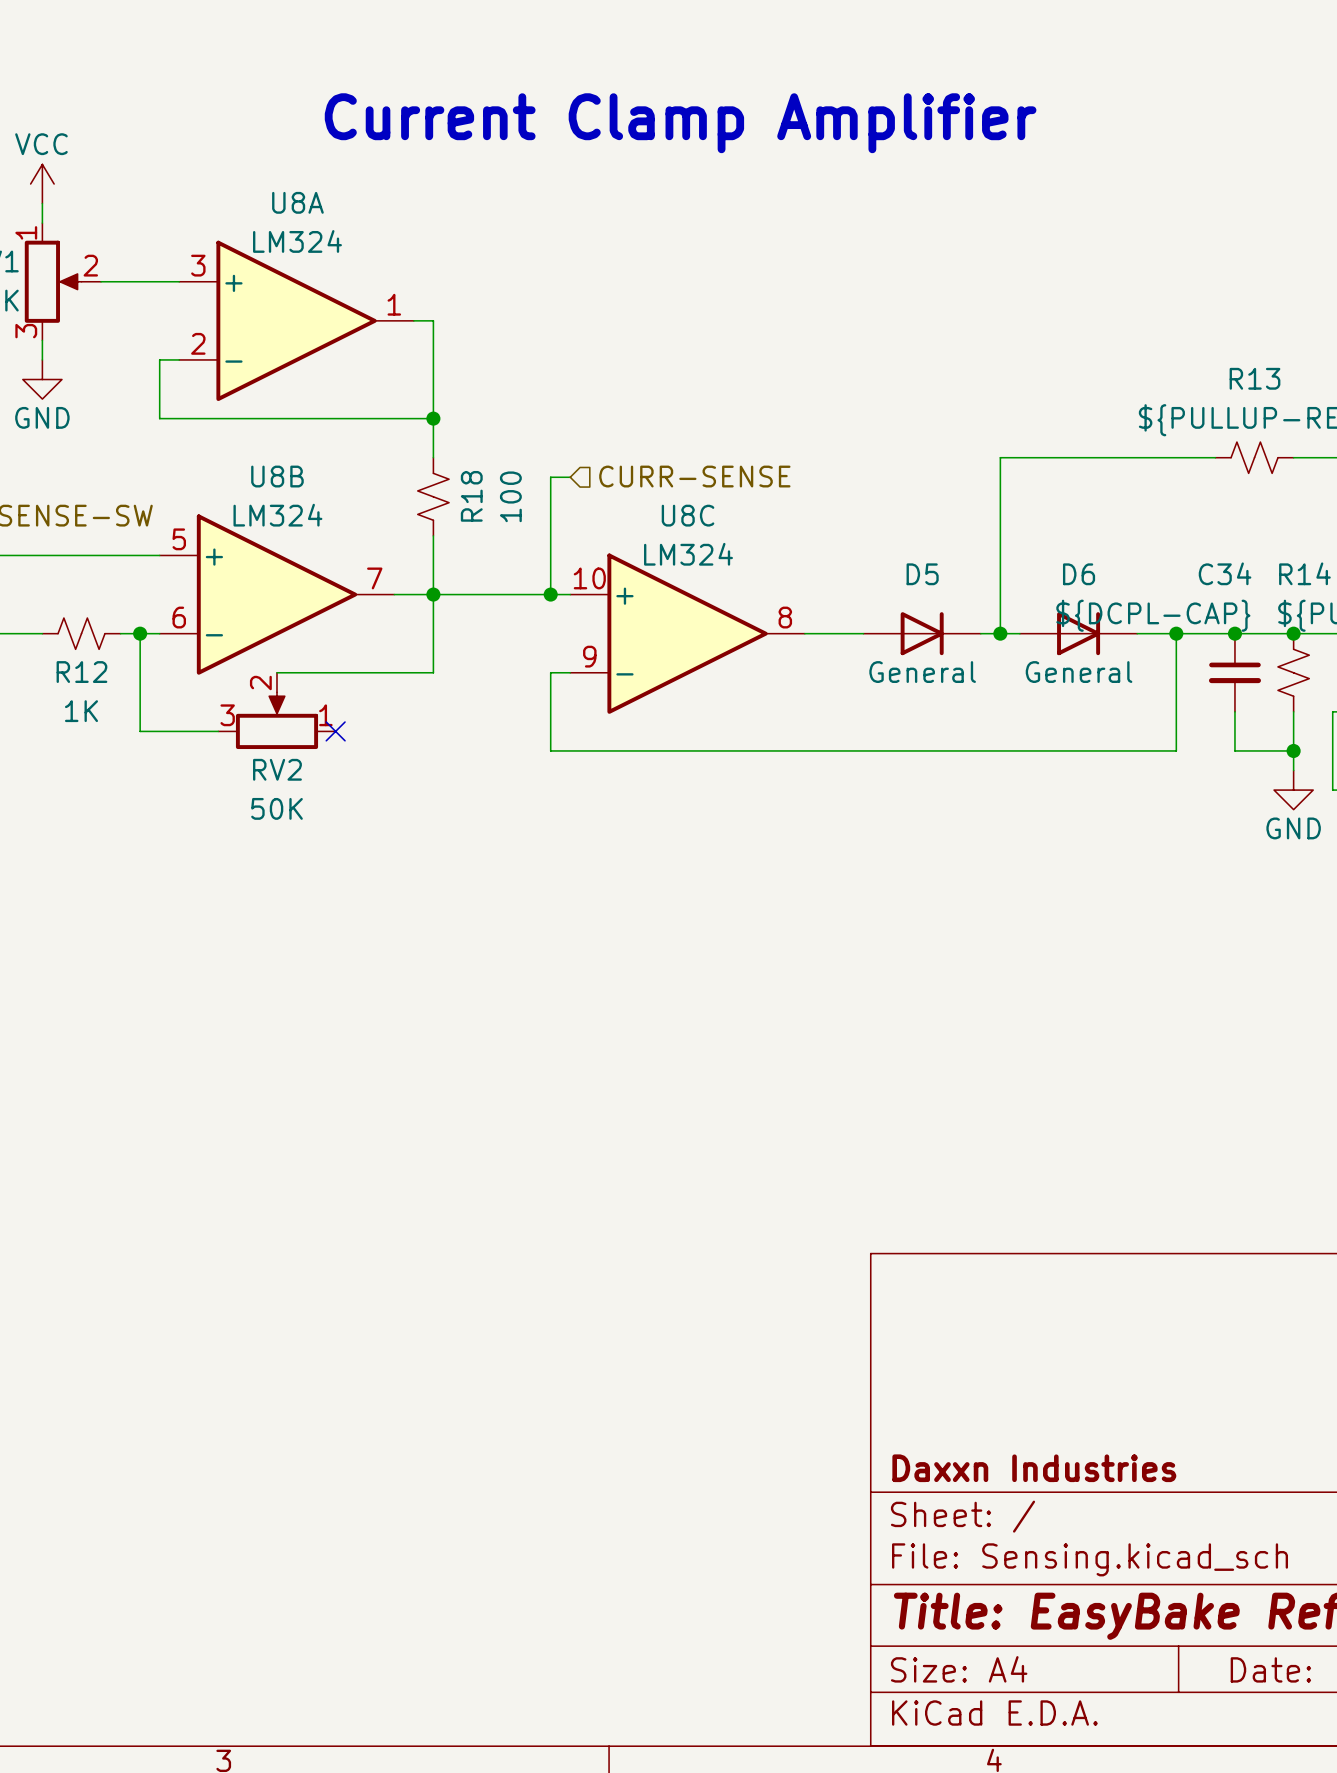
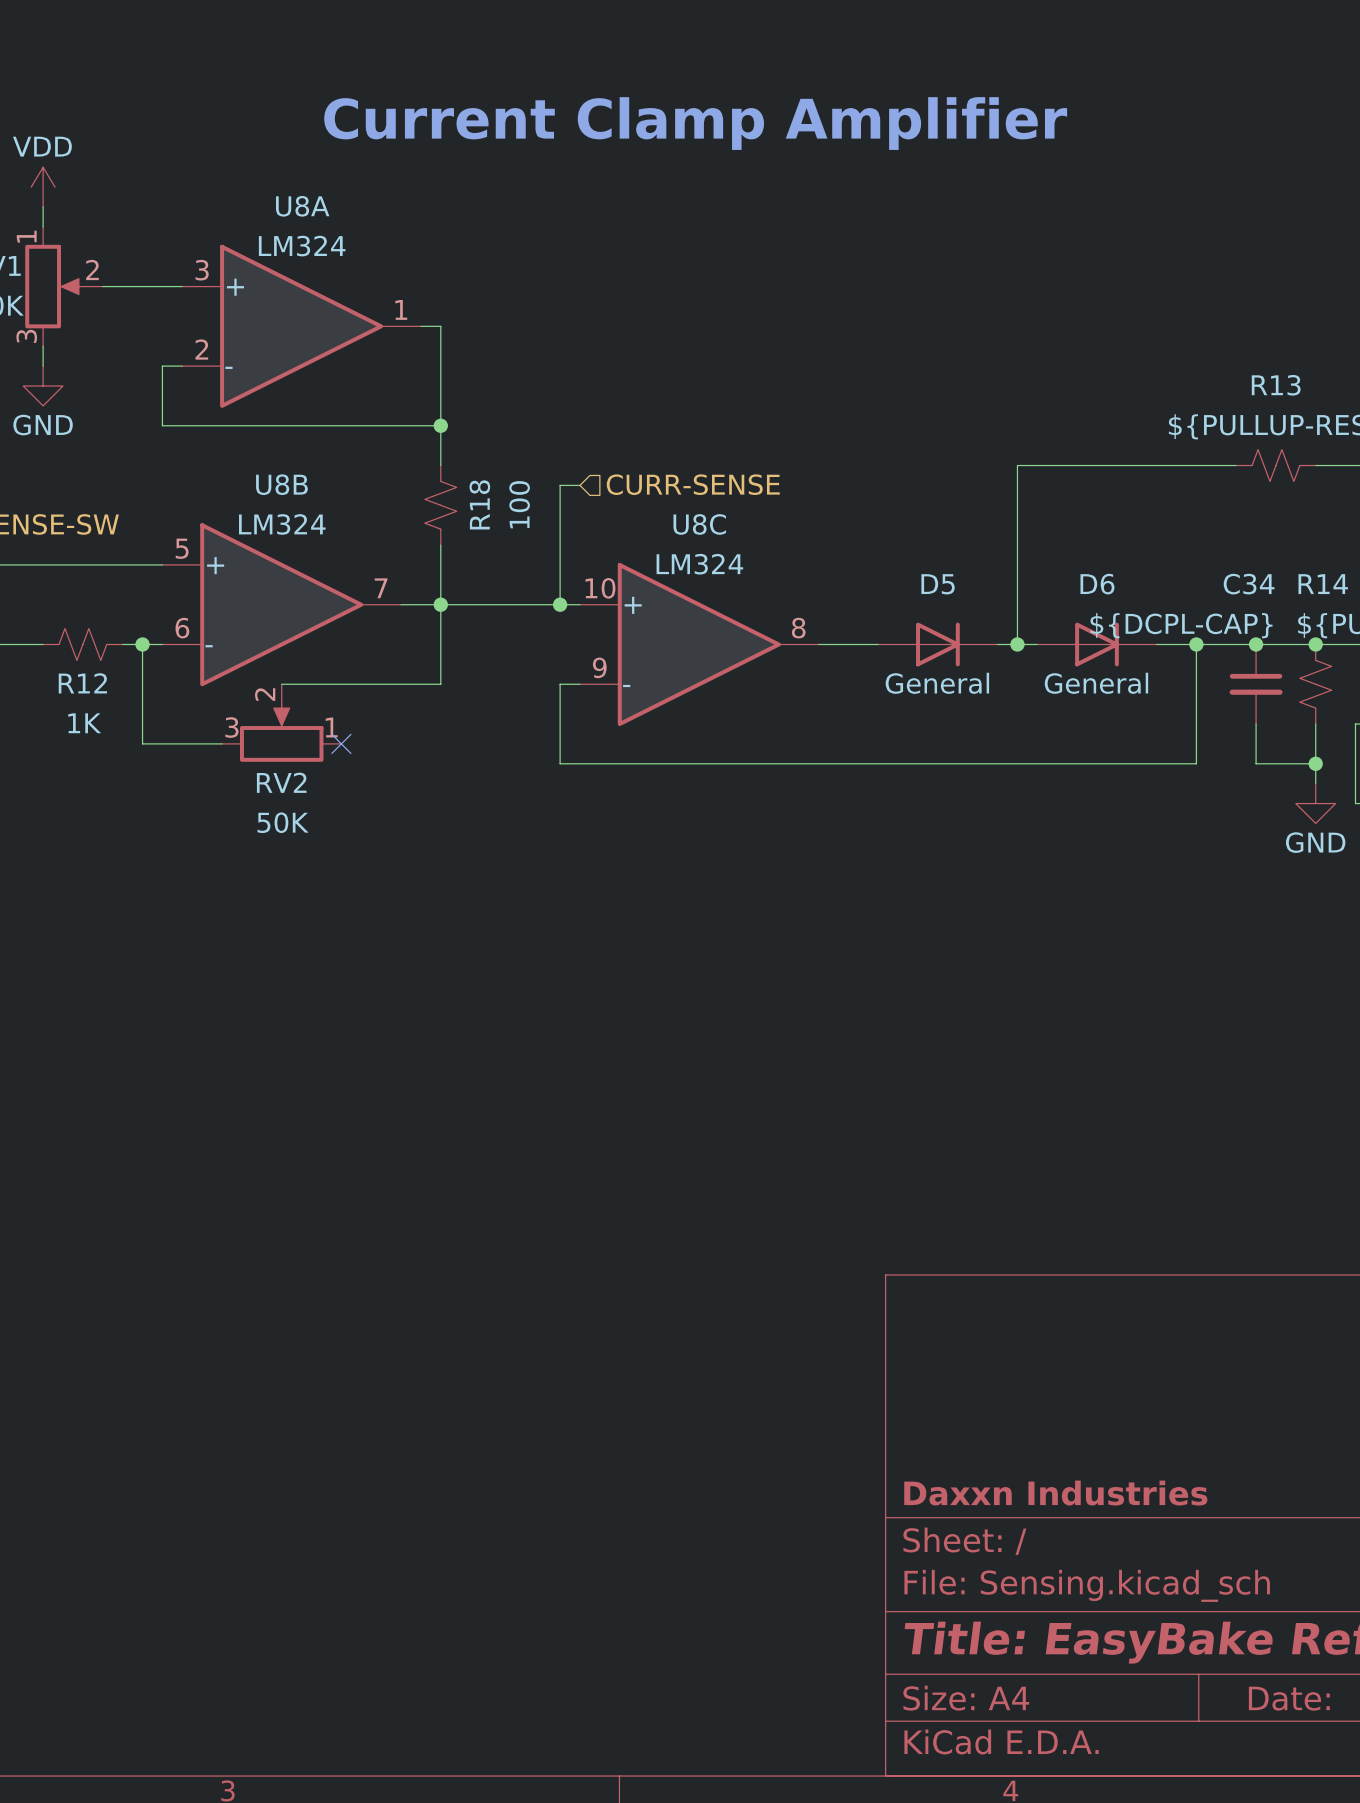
power symbol: VCC (42, 184) -> VDD (43, 187)

